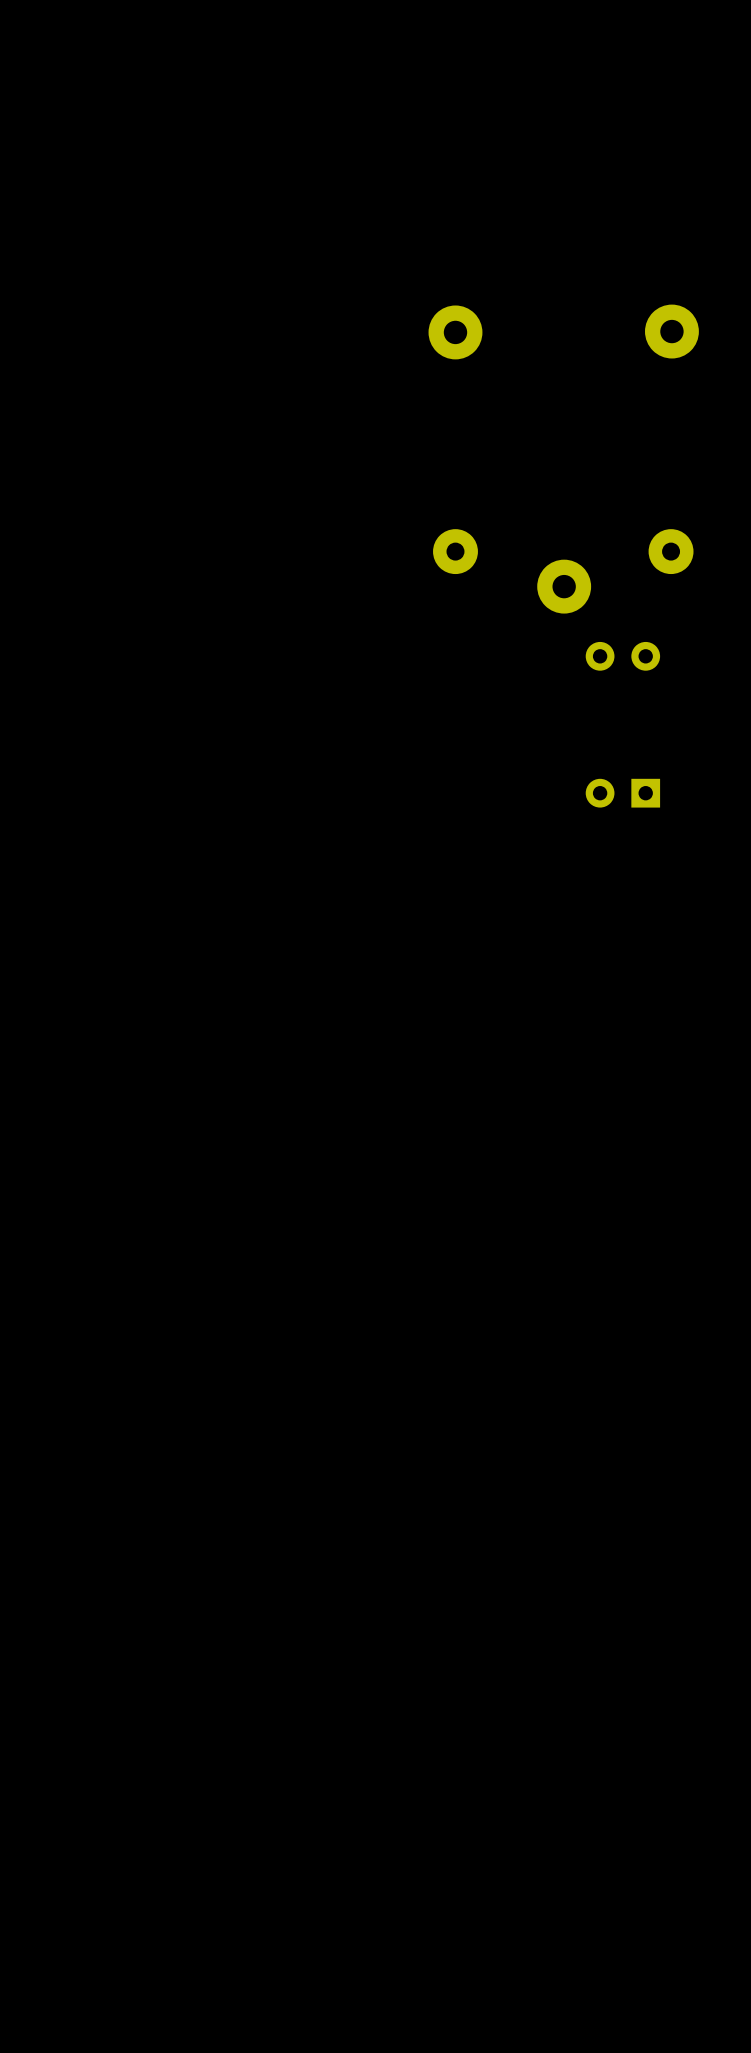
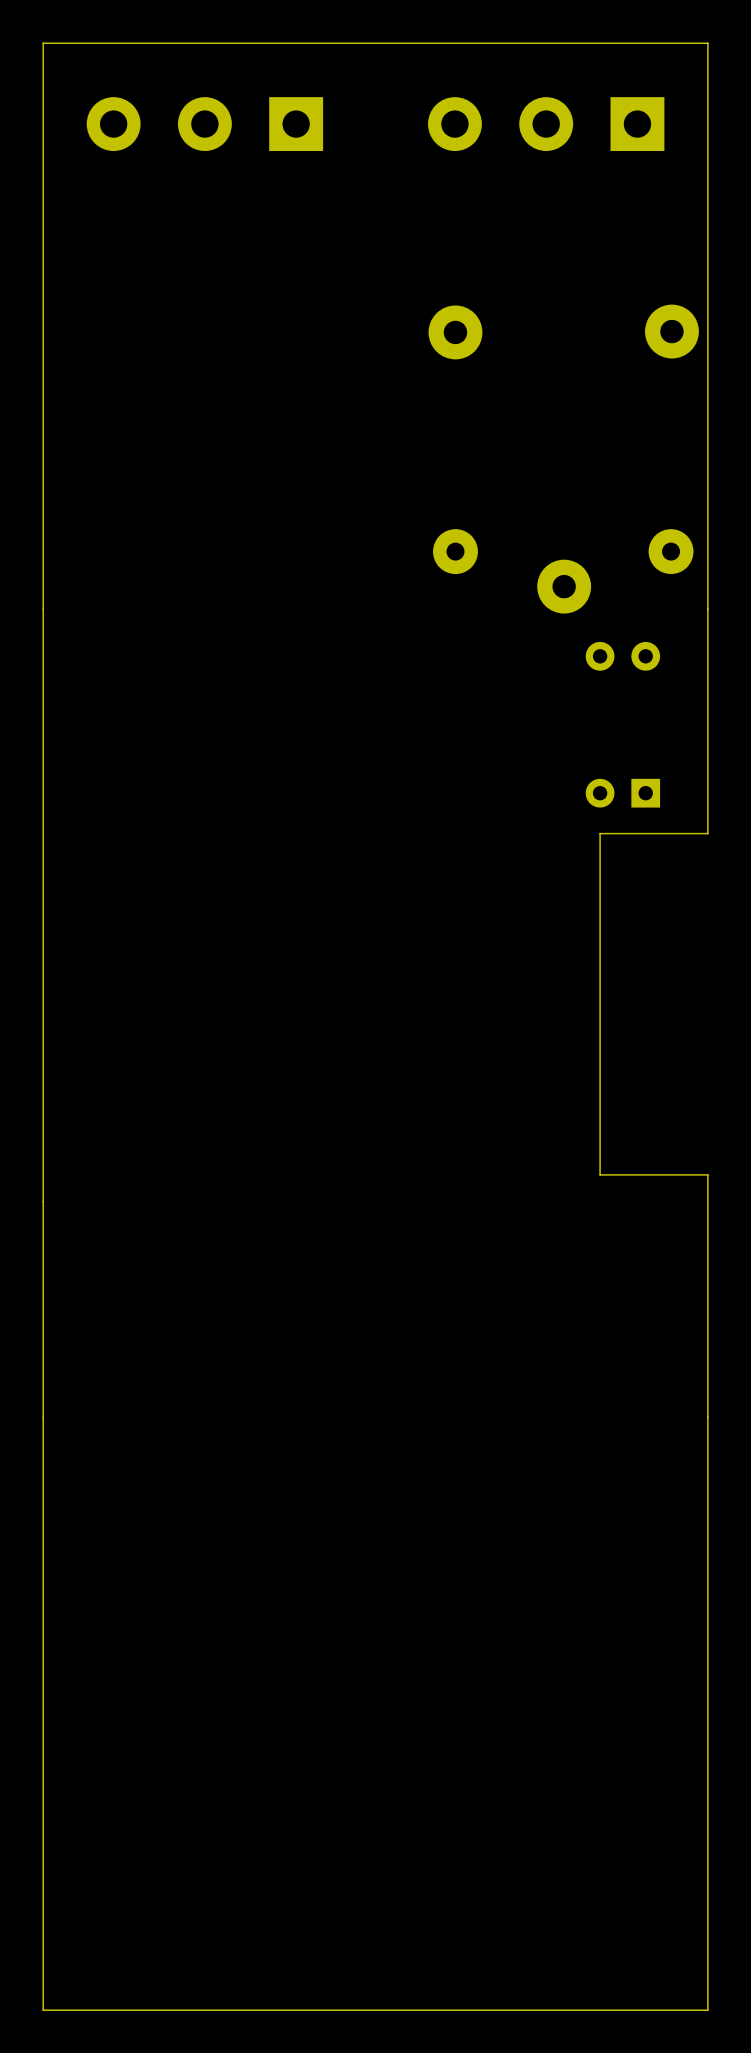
board edge: none -> (707, 43) (707, 833) (600, 833) (600, 1174) (707, 1174) (707, 2010) (43, 2010) (43, 43) (707, 43)
part: none -> (204, 124)
part: none -> (546, 124)

